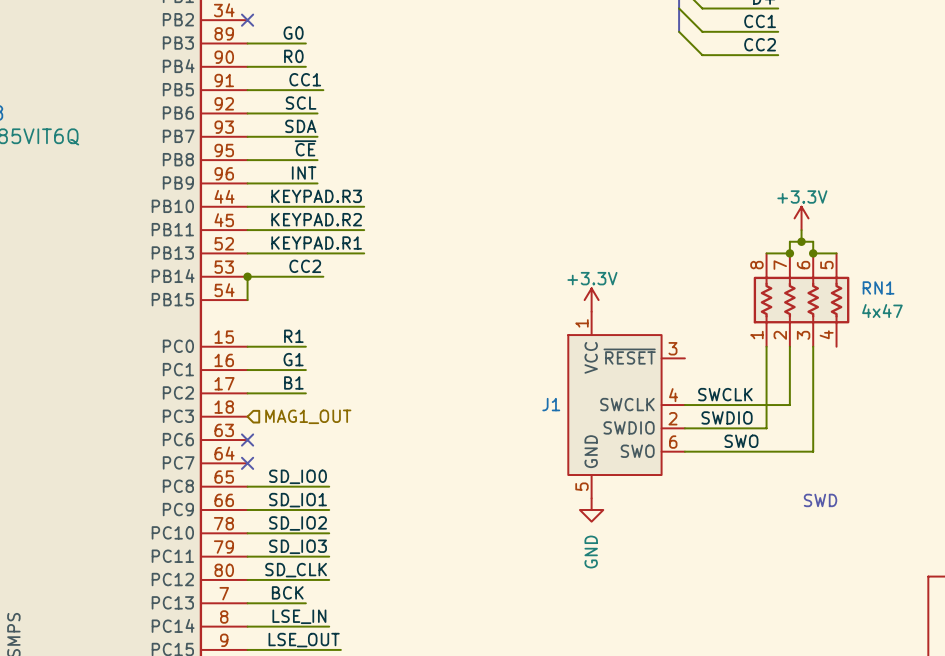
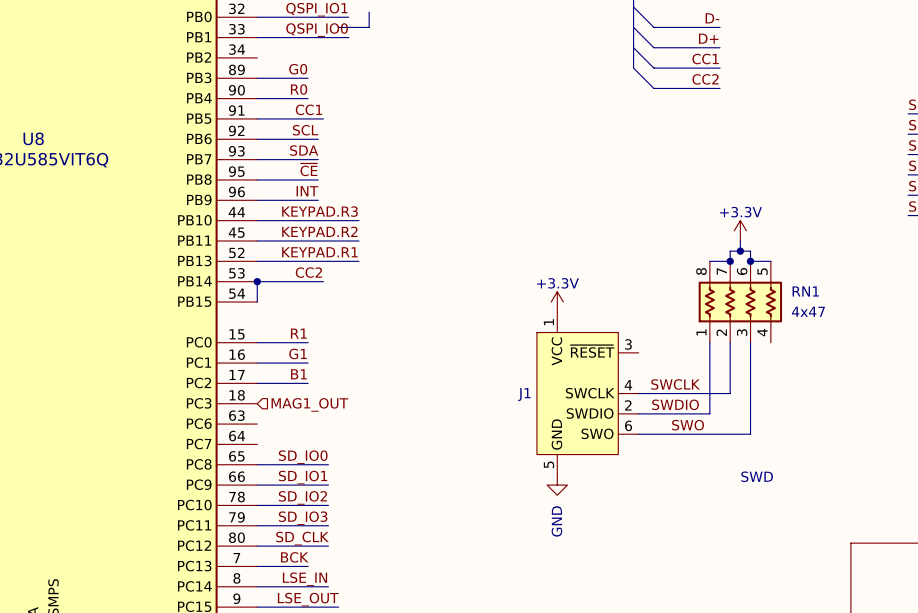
no-connect mark: (247, 20) -> none
no-connect mark: (247, 440) -> none
no-connect mark: (247, 463) -> none

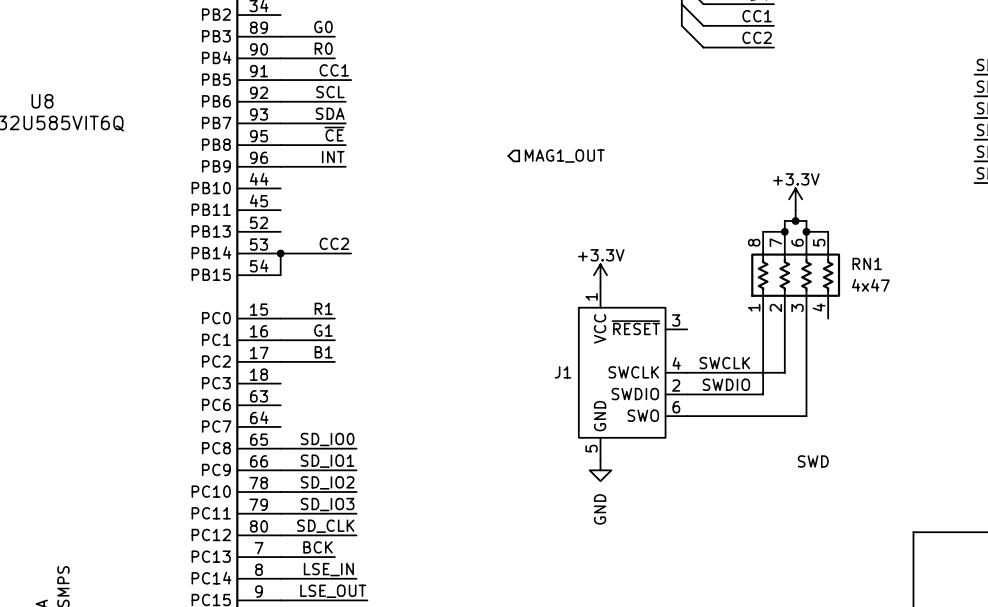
hierarchical label: none -> MAG1_OUT (564, 156)
label: KEYPAD.R3 (320, 211) -> none
wire: (257, 220) (358, 220) -> none
label: KEYPAD.R2 (319, 231) -> none
wire: (257, 240) (358, 240) -> none
label: KEYPAD.R1 (319, 252) -> none
wire: (257, 261) (358, 261) -> none
hierarchical label: MAG1_OUT (309, 404) -> none
label: SWO (688, 425) -> none

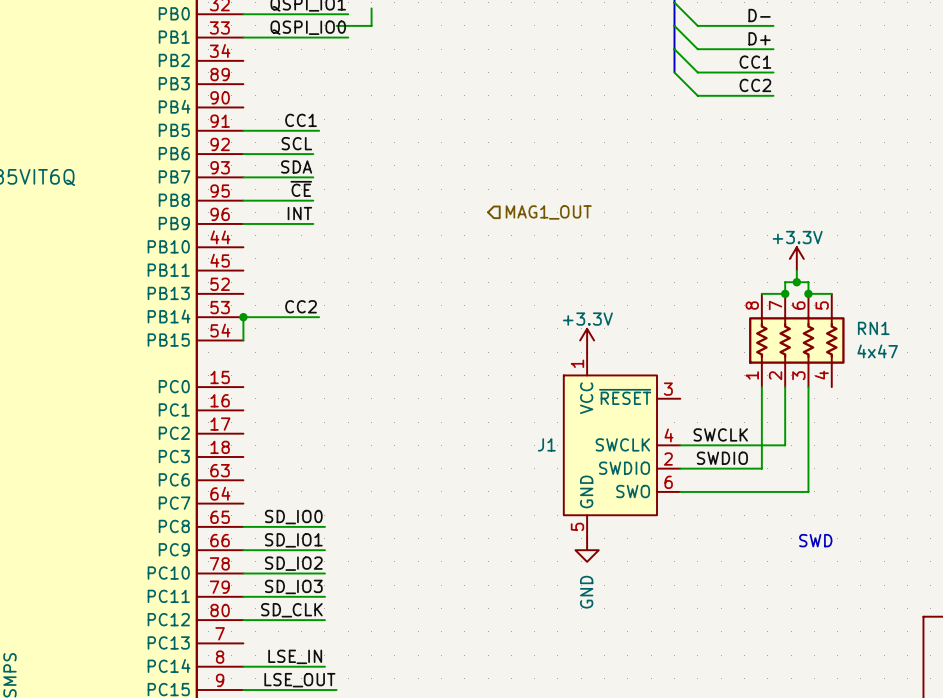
label: G0 (323, 27) -> none
wire: (280, 36) (334, 36) -> none
label: R0 (323, 48) -> none
wire: (280, 58) (334, 58) -> none
label: R1 (323, 308) -> none
wire: (280, 318) (334, 318) -> none
label: G1 (323, 330) -> none
wire: (280, 340) (334, 340) -> none
label: B1 (323, 352) -> none
wire: (280, 361) (334, 361) -> none
label: BCK (318, 547) -> none
wire: (280, 557) (334, 557) -> none

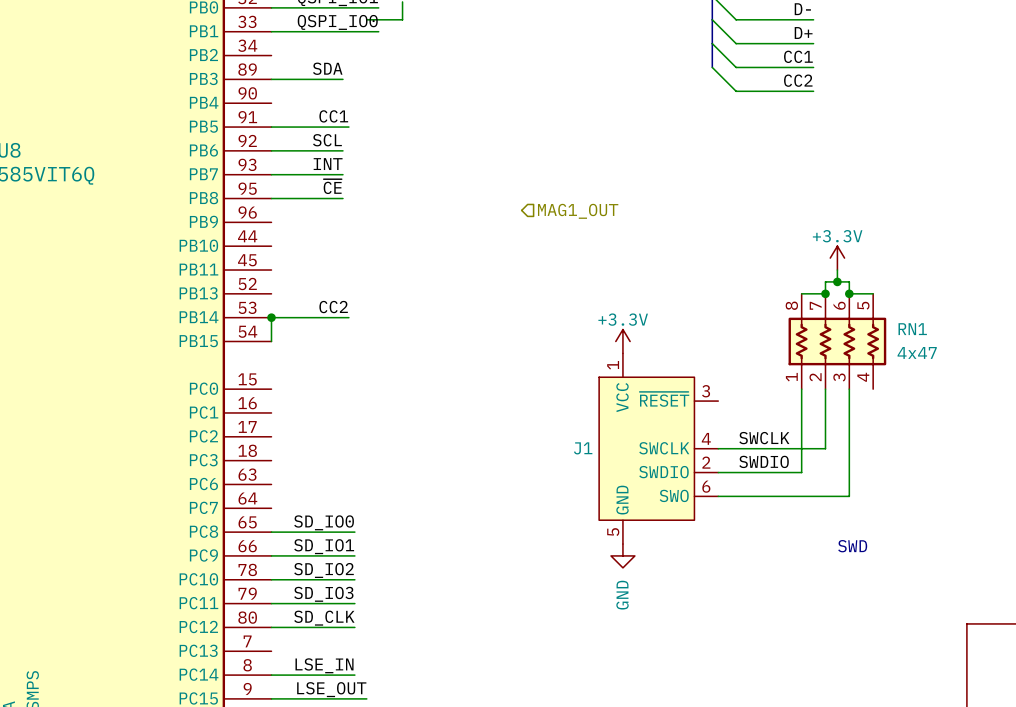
label: none -> SDA (327, 68)
label: SDA (296, 166) -> INT (328, 164)
label: INT (299, 213) -> none
wire: (243, 223) (313, 223) -> (271, 79) (342, 79)

